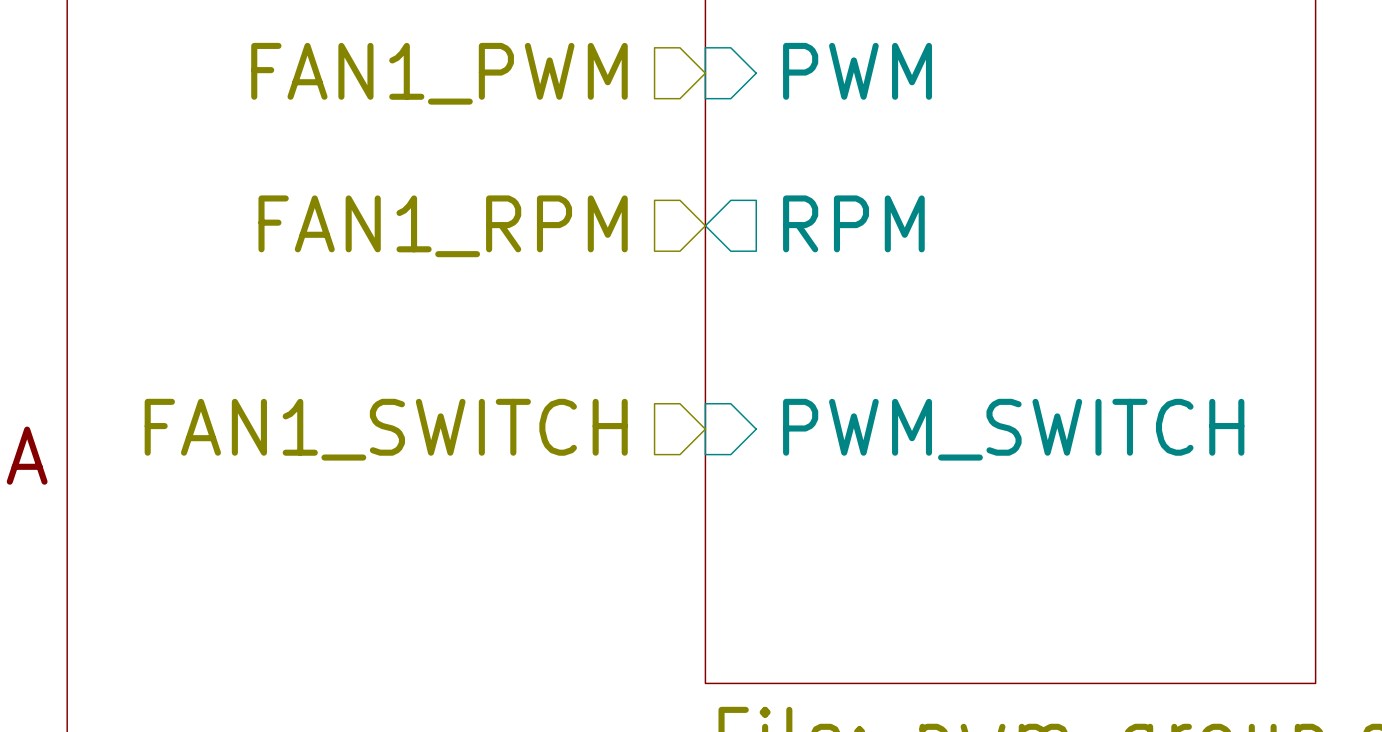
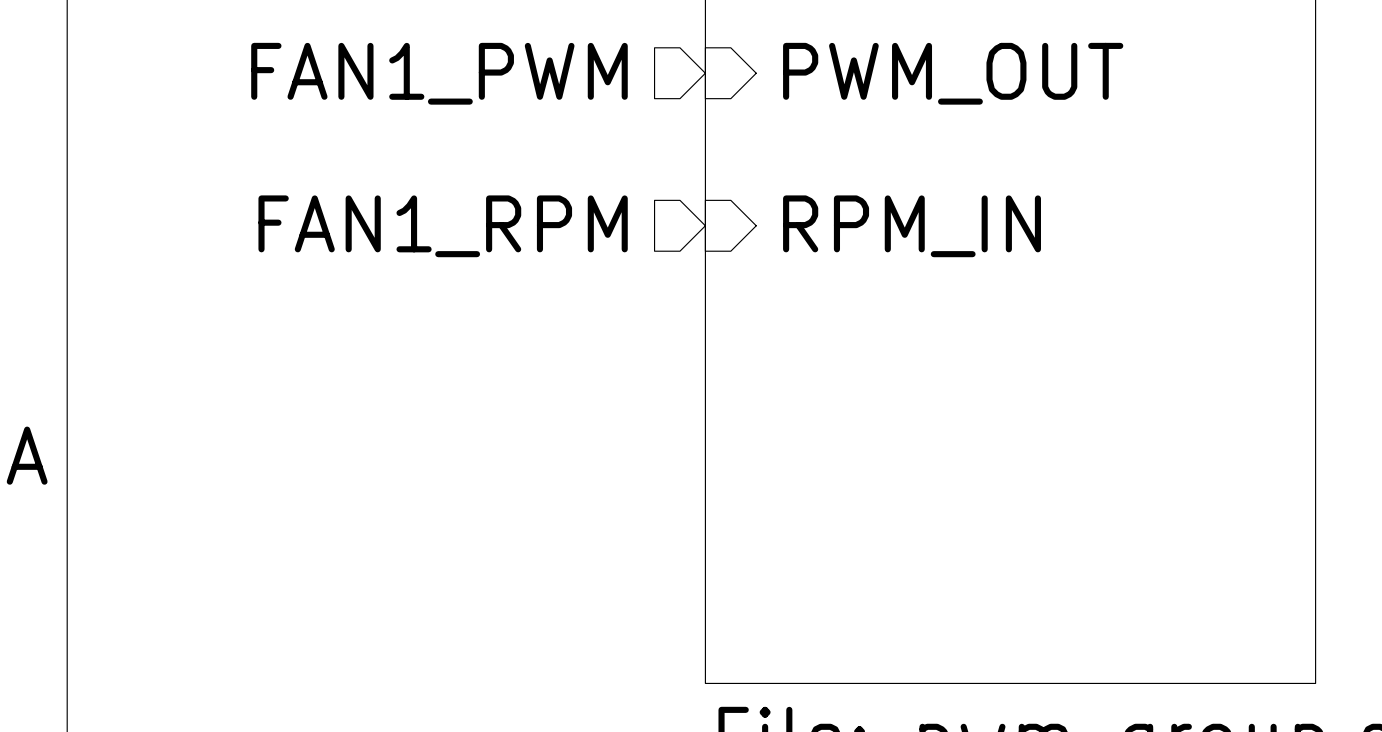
sheet pin: PWM (857, 71) -> PWM_OUT (953, 73)
sheet pin shape: output (853, 223) -> input (912, 226)
sheet pin: RPM (853, 223) -> RPM_IN (912, 226)
hierarchical label: FAN1_SWITCH (386, 429) -> none
sheet pin: PWM_SWITCH (1013, 429) -> none

